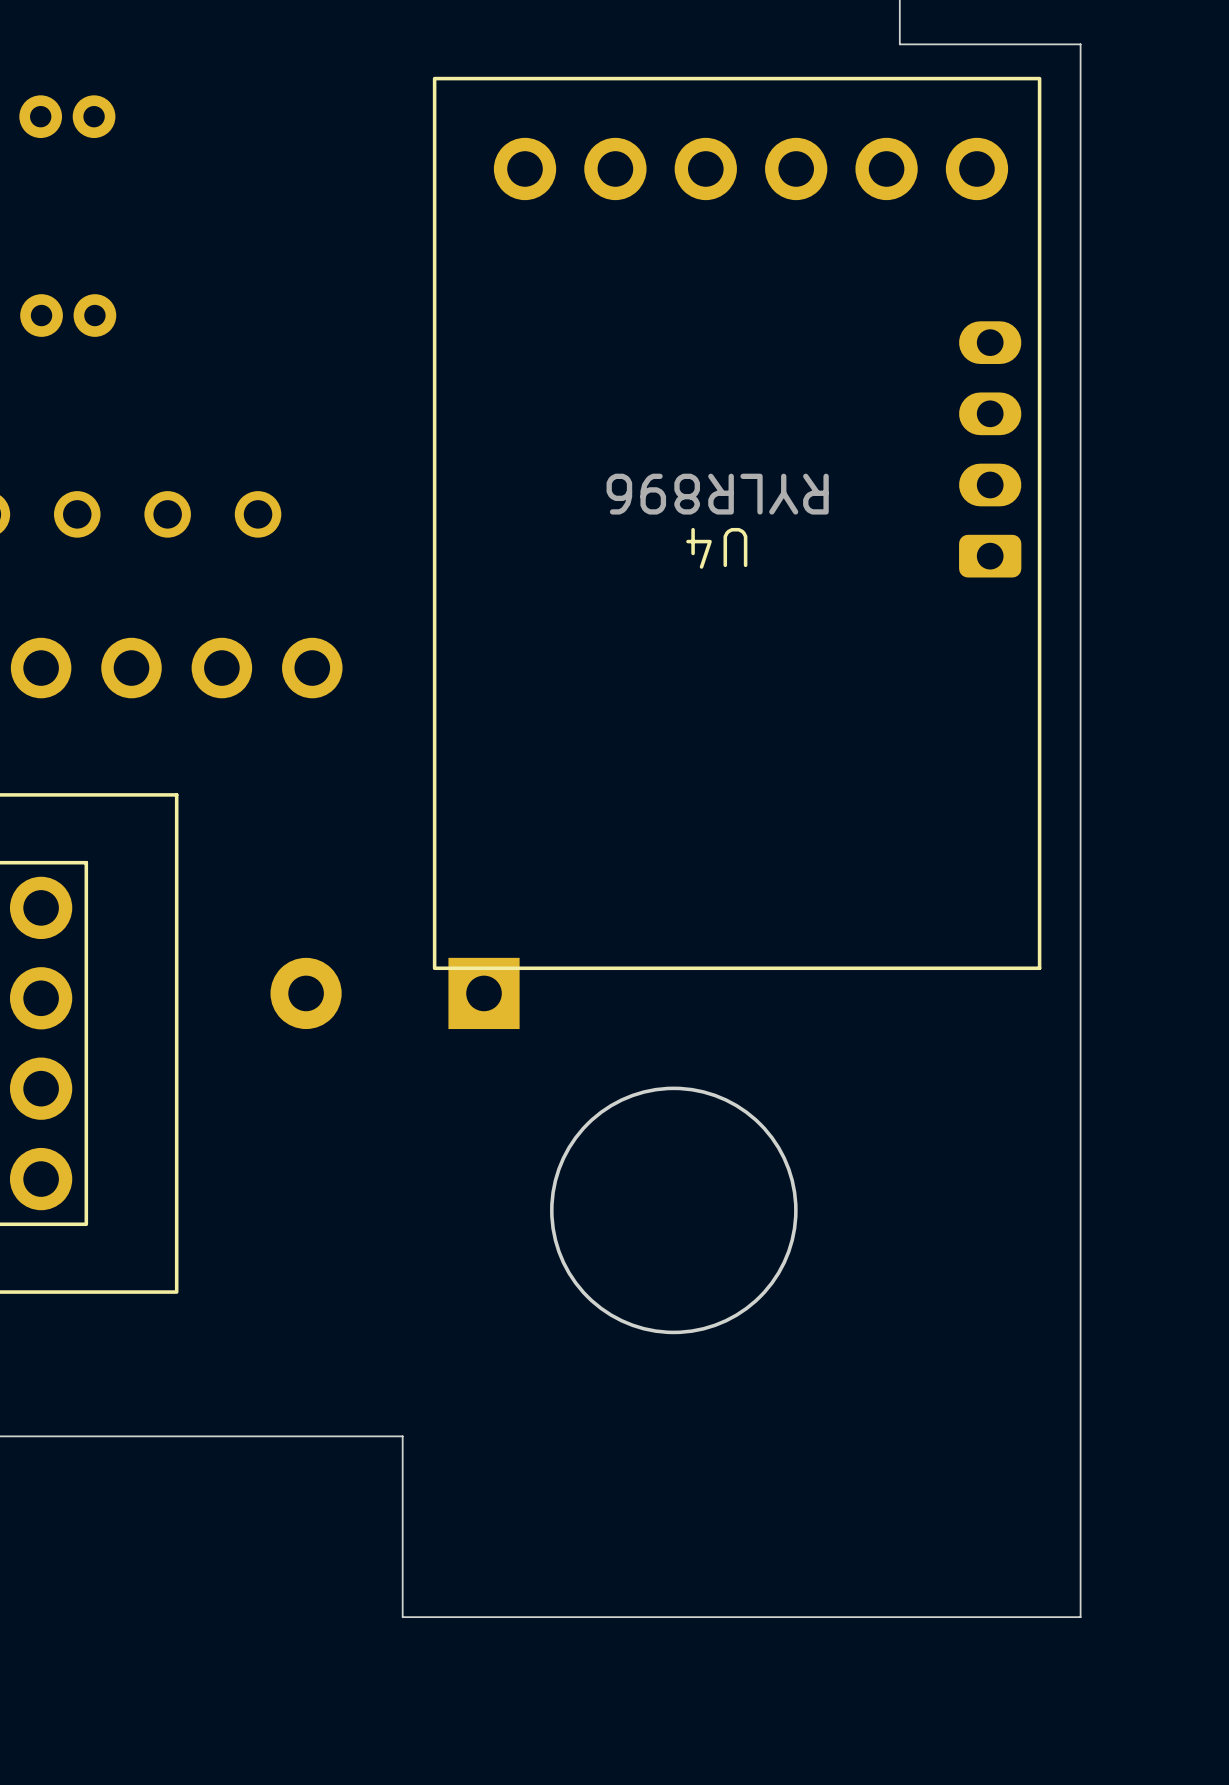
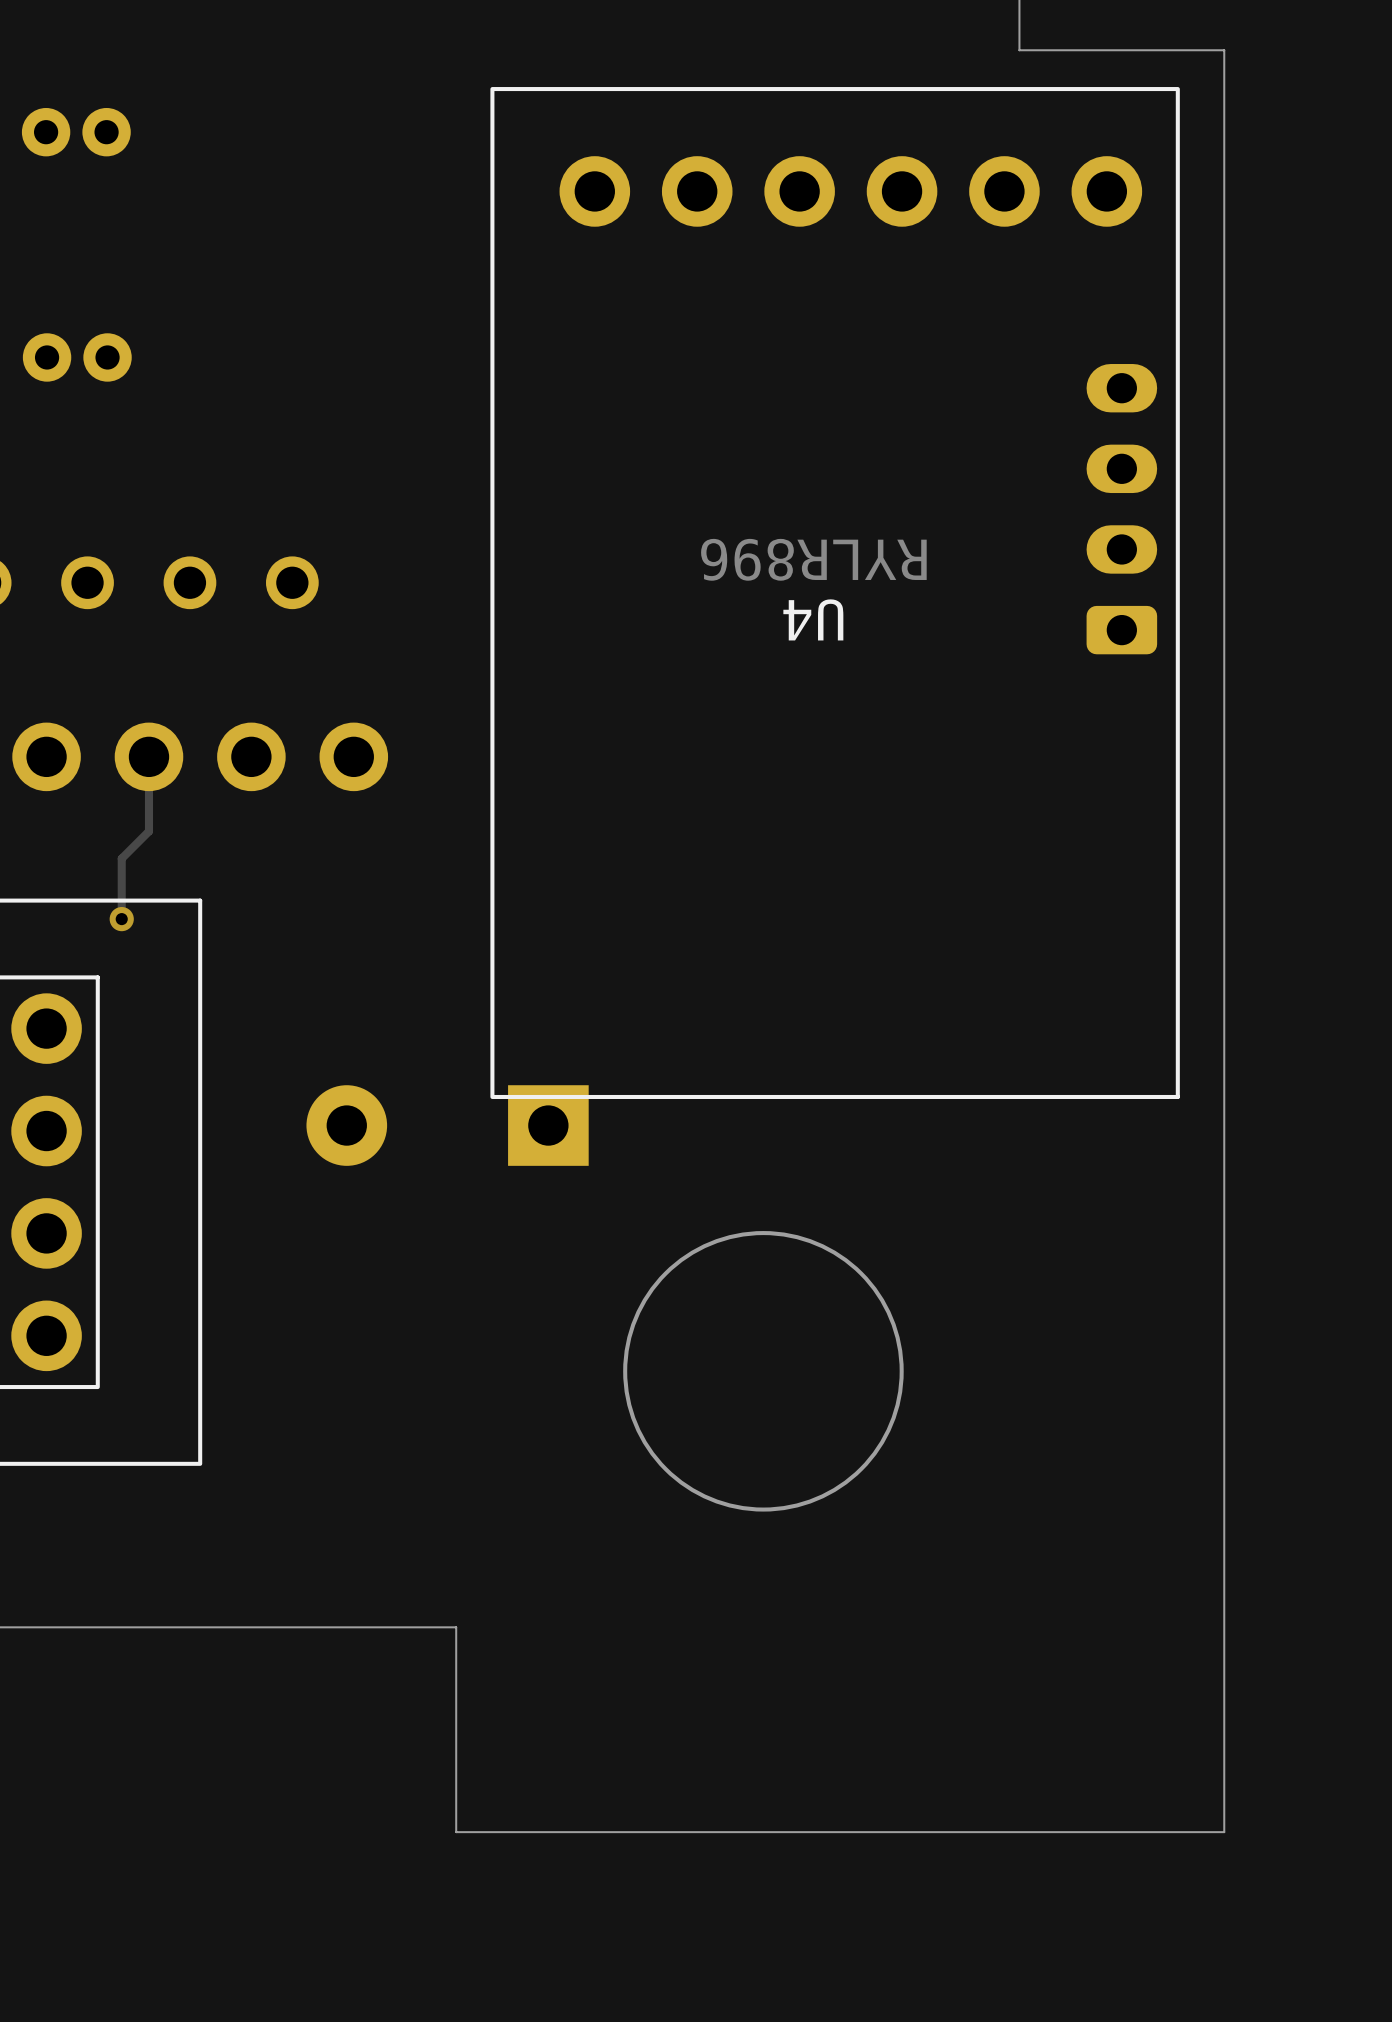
track: none -> (148, 756) (148, 831) (121, 858) (121, 919)
via: none -> (121, 919)

